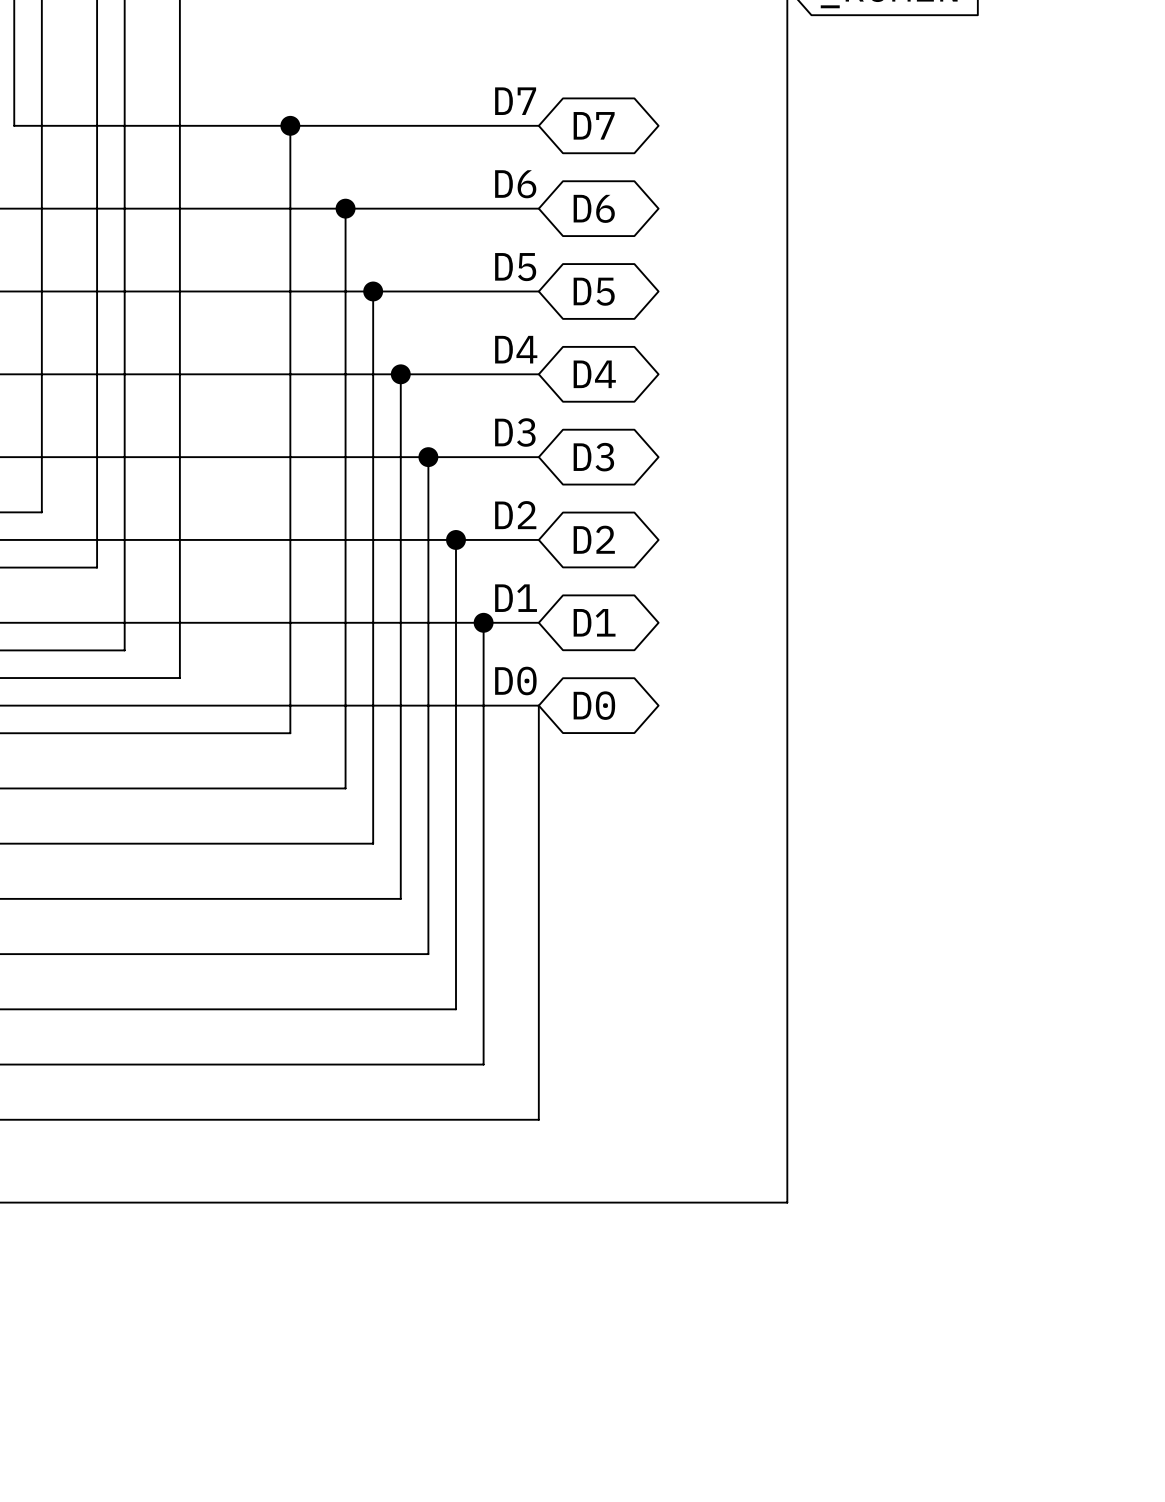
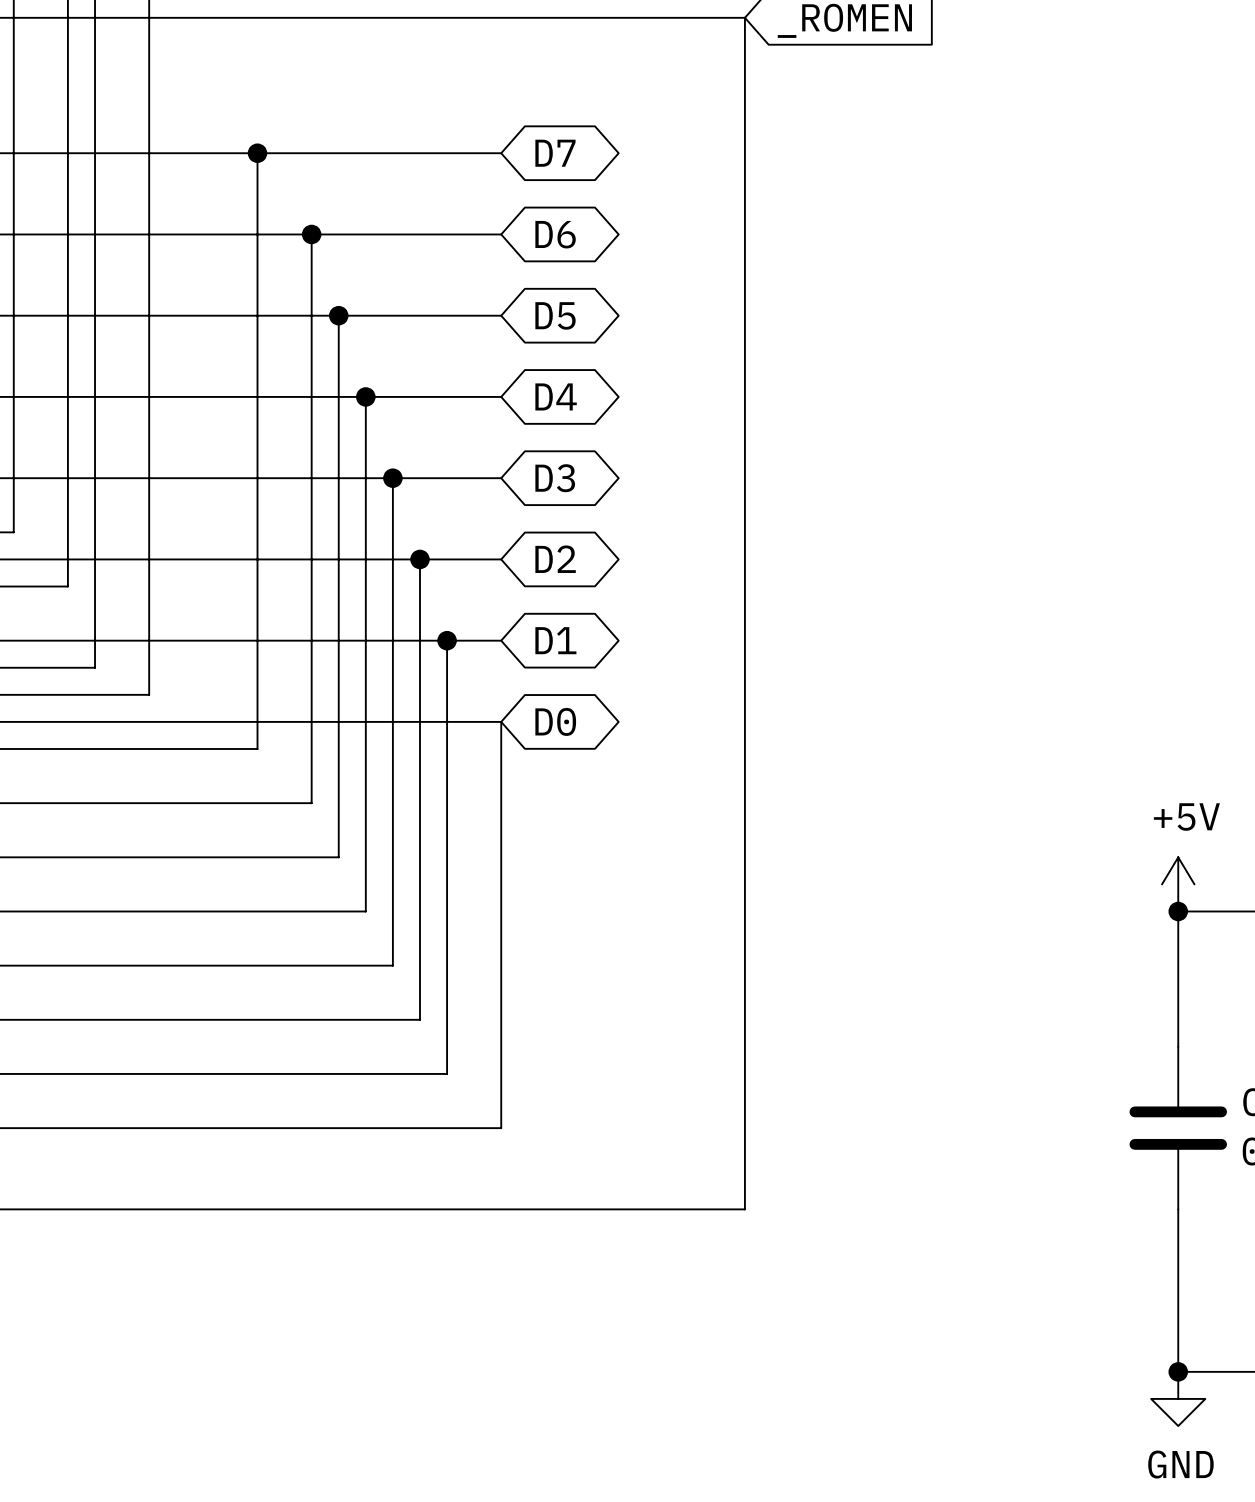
label: D7 (515, 101) -> none
label: D6 (515, 184) -> none
label: D5 (515, 267) -> none
label: D4 (516, 349) -> none
label: D3 (515, 432) -> none
label: D2 (515, 515) -> none
label: D1 (516, 598) -> none
label: D0 (515, 680) -> none

